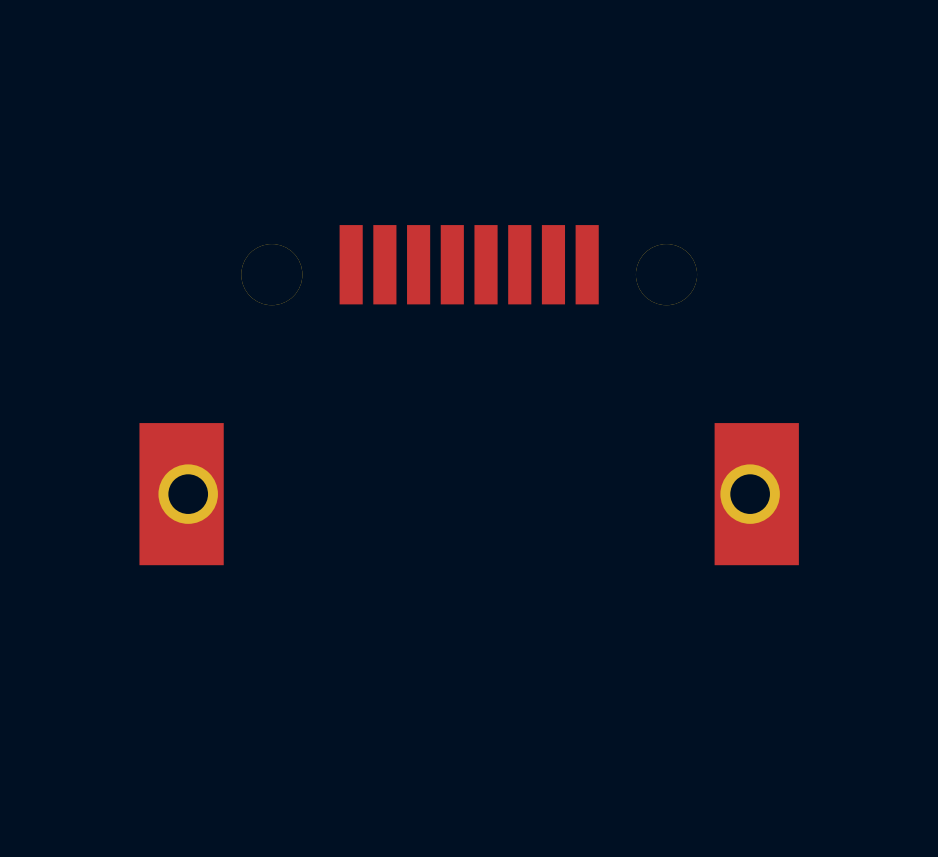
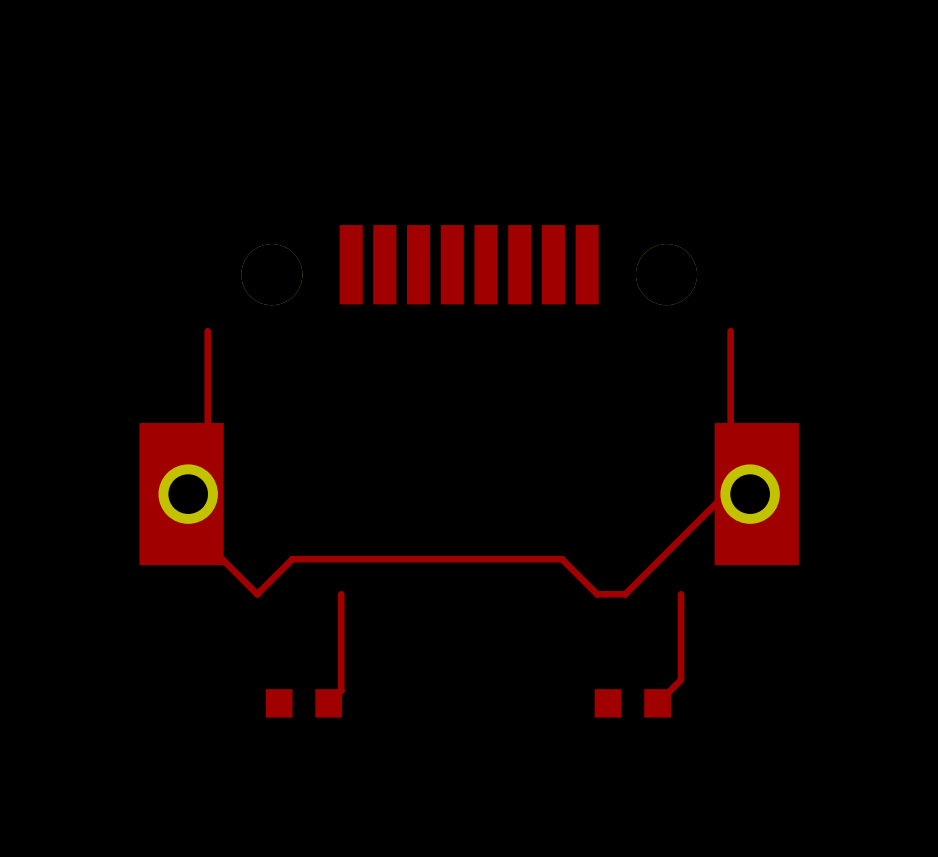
top track: none -> (730, 331) (730, 488) (625, 594) (597, 594) (562, 559) (292, 559) (257, 594) (207, 544) (207, 331)
top track: none -> (341, 594) (341, 690) (328, 703)
top track: none -> (681, 594) (681, 679) (657, 703)
part: none -> (303, 703)
part: none -> (632, 703)

